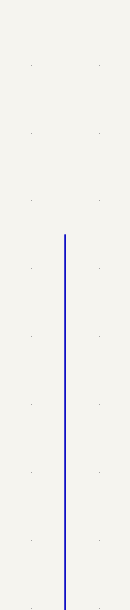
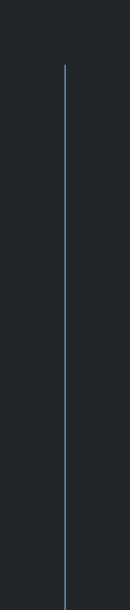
line: none -> (65, 65) (65, 234)

